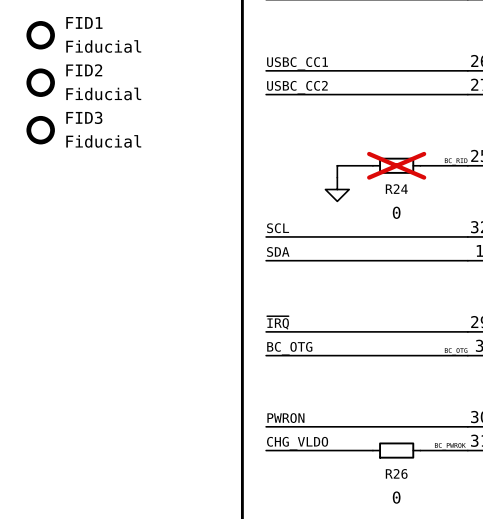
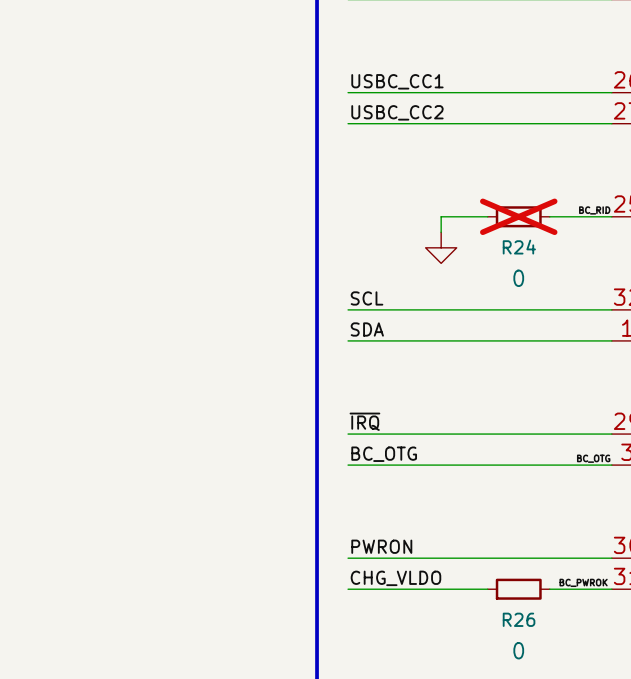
FID1: Fiducial (40, 35) -> none
FID2: Fiducial (40, 82) -> none
FID3: Fiducial (40, 130) -> none

